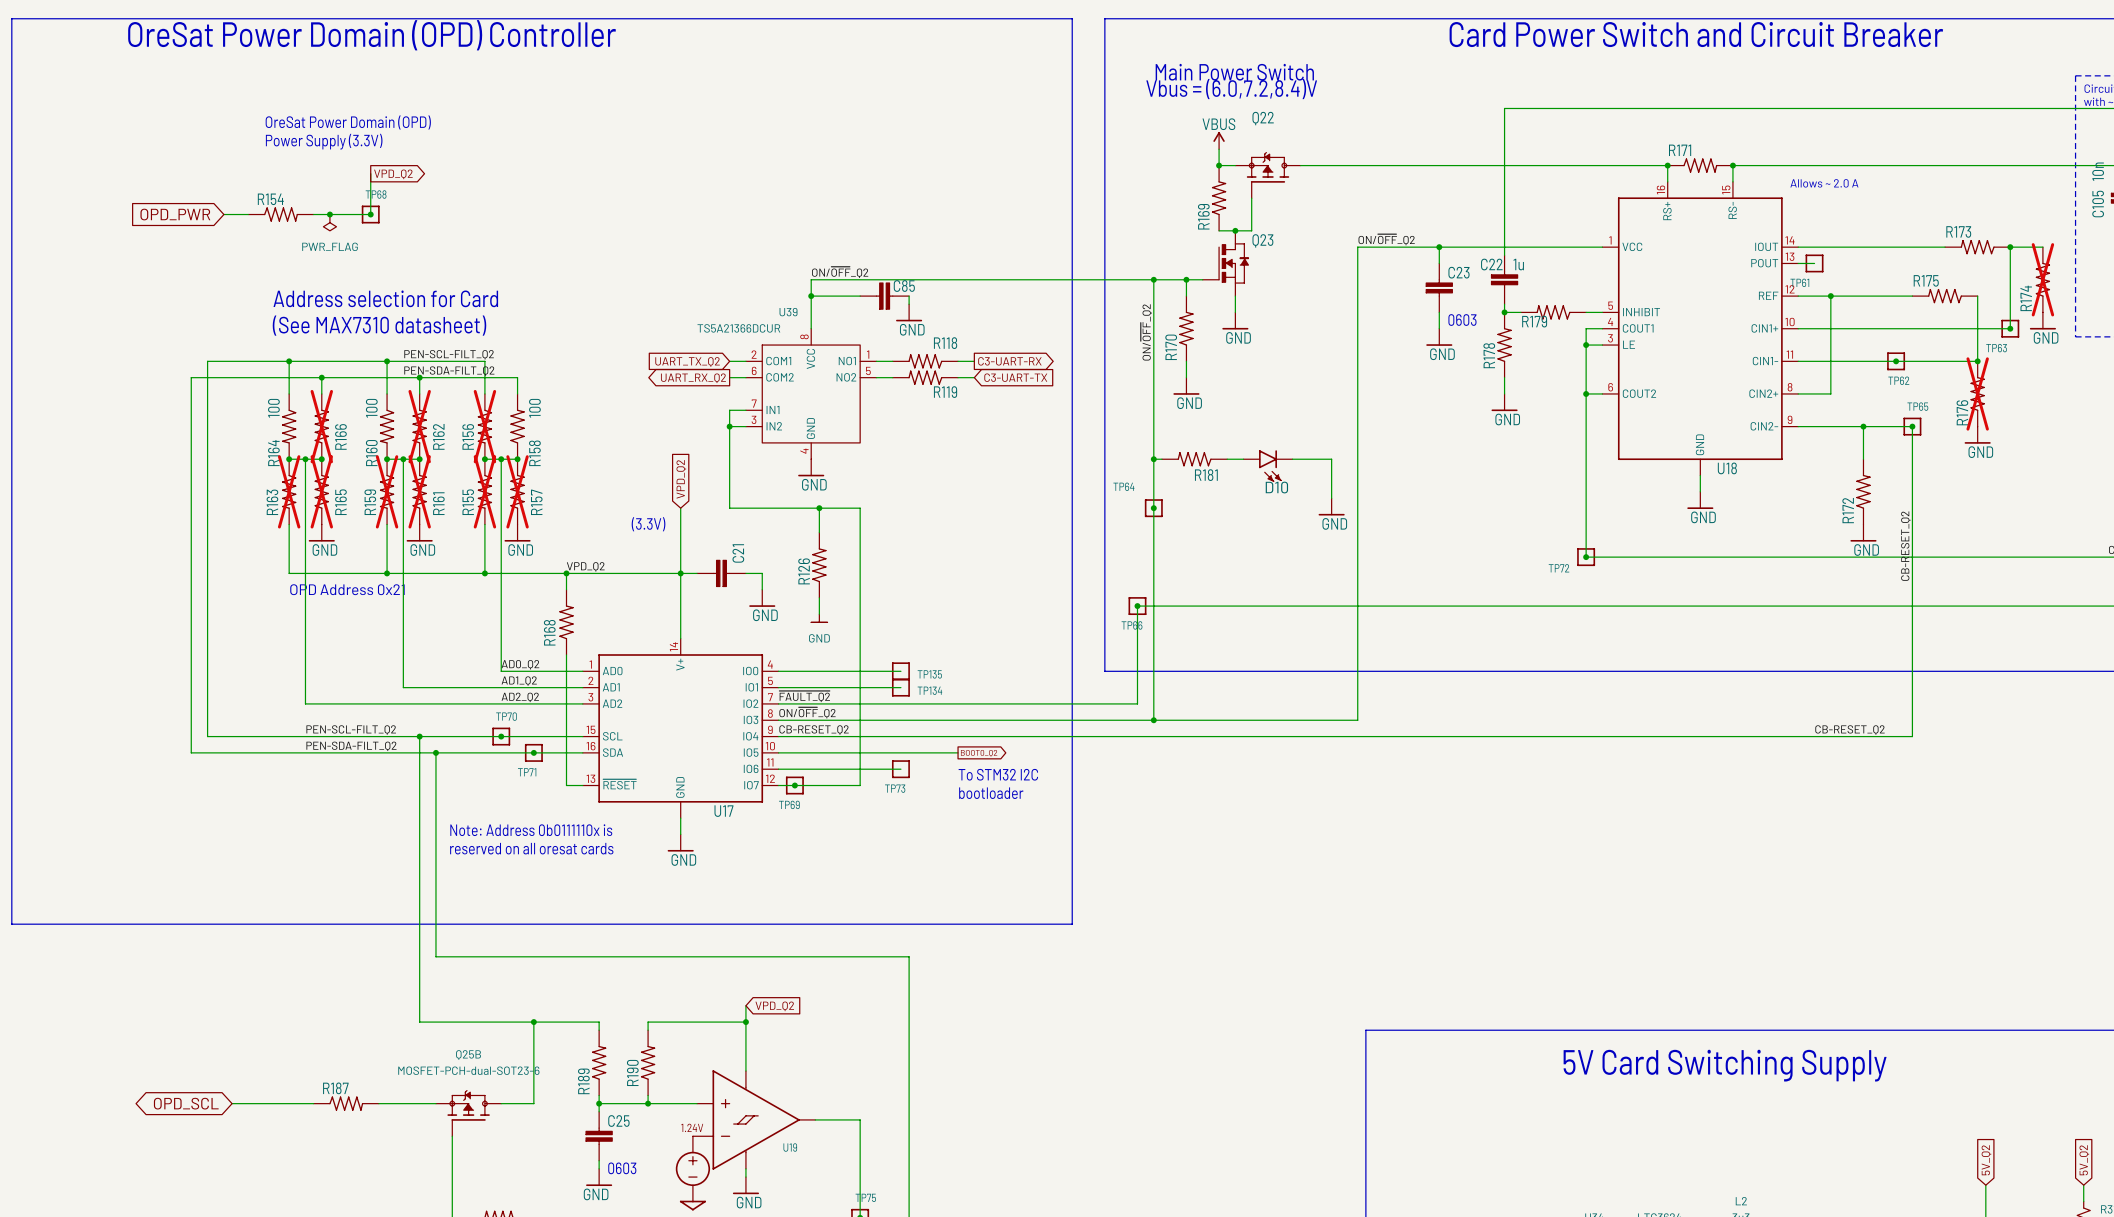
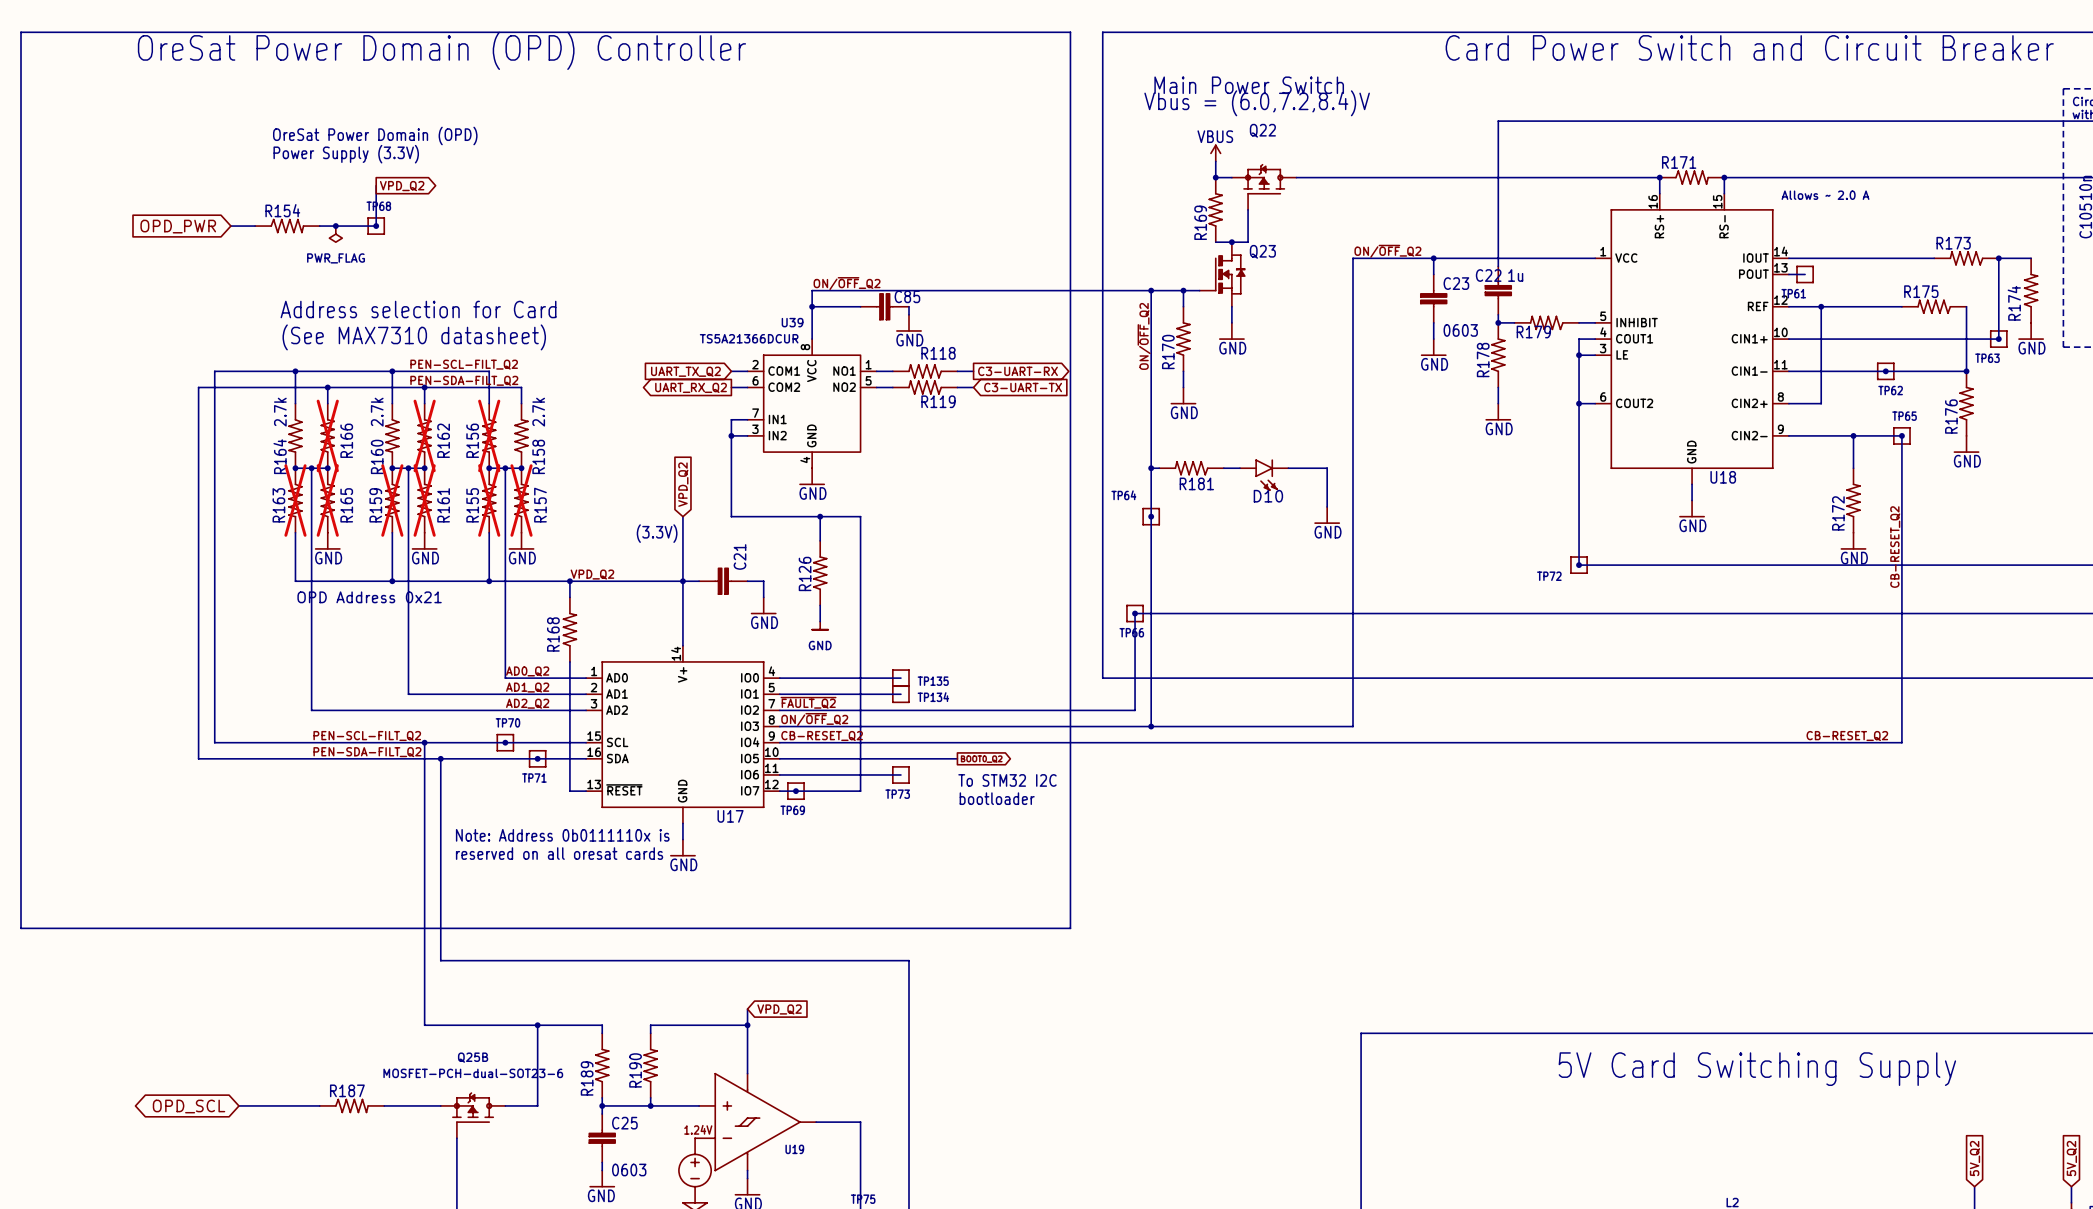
R174 do-not-place cross: (2042, 279) -> none
R176 do-not-place cross: (1977, 393) -> none
R164 value: 100 (273, 408) -> 2.7k (280, 412)
R160 value: 100 (371, 408) -> 2.7k (377, 412)
R158 value: 100 (534, 408) -> 2.7k (538, 412)

